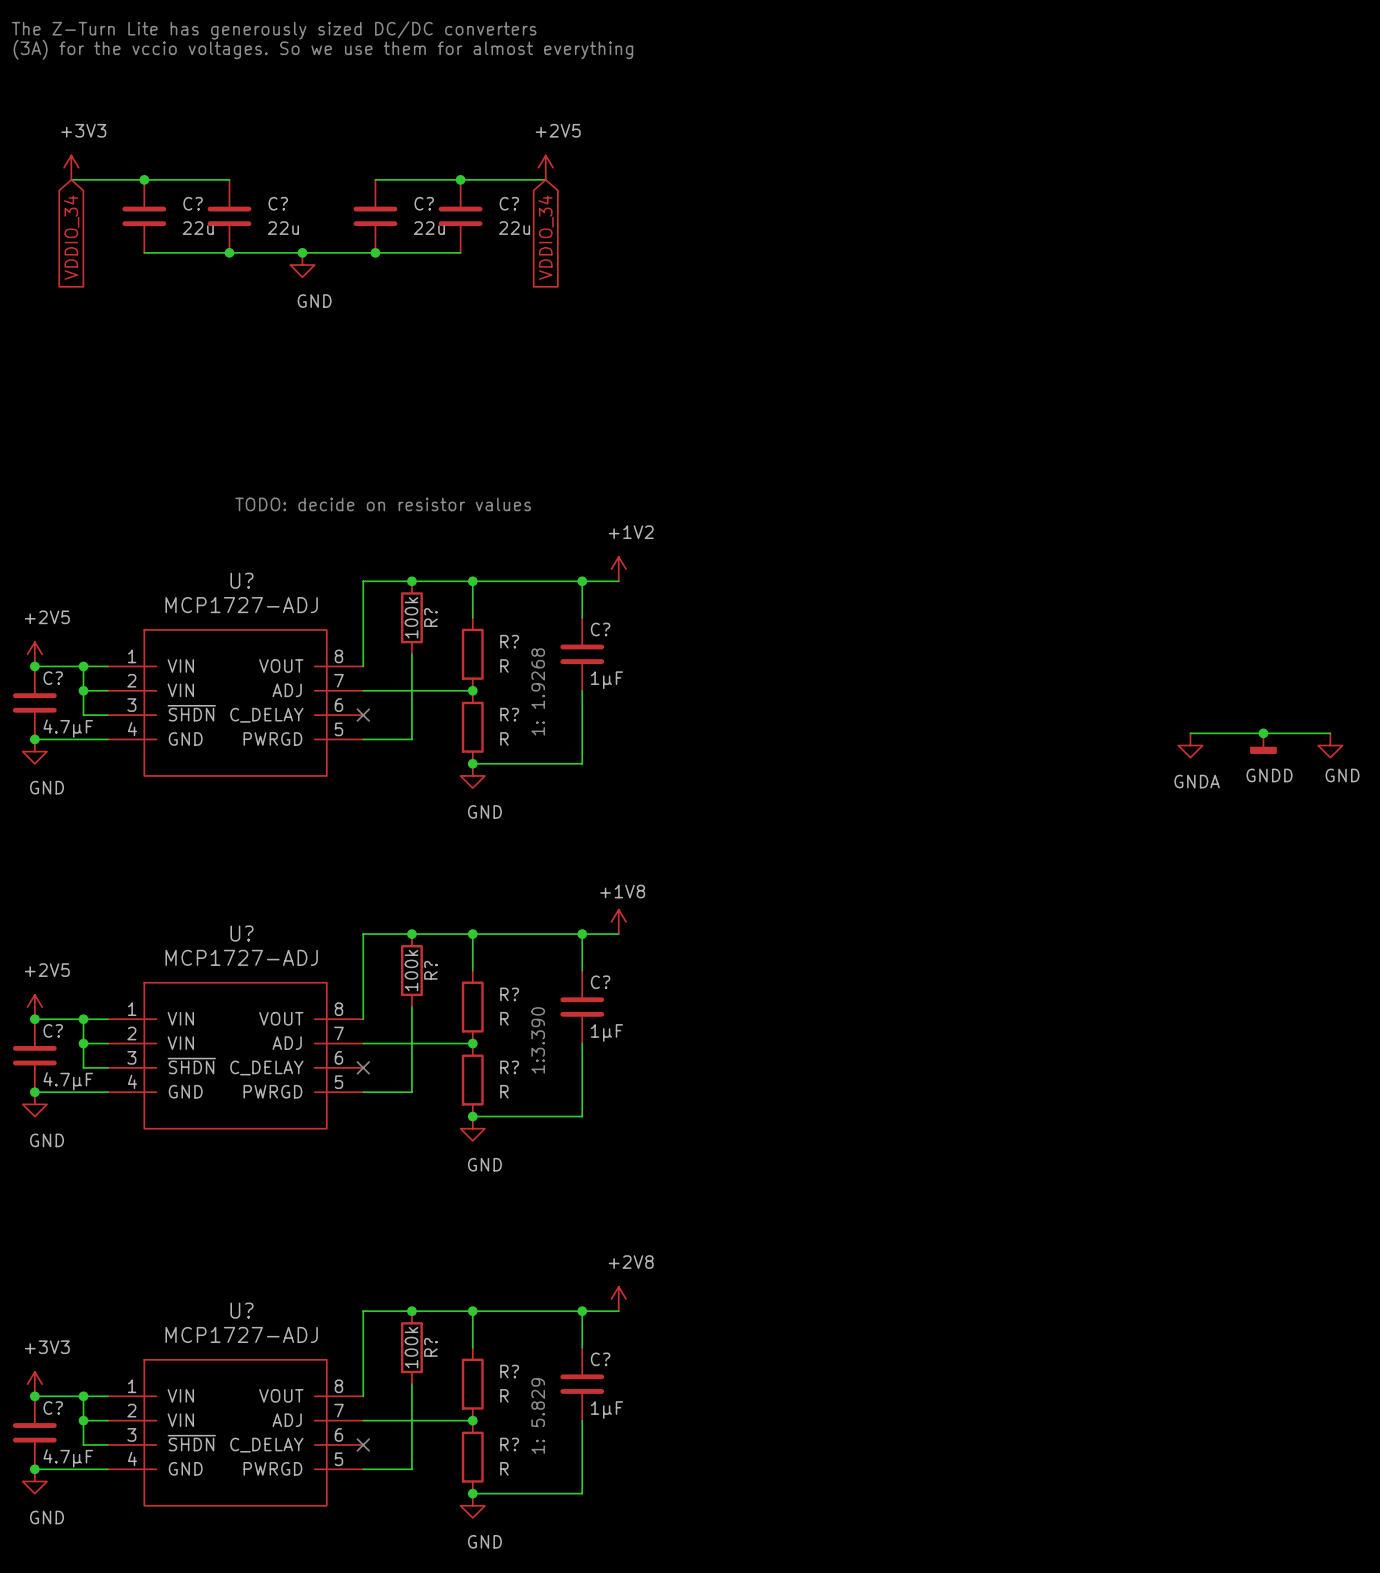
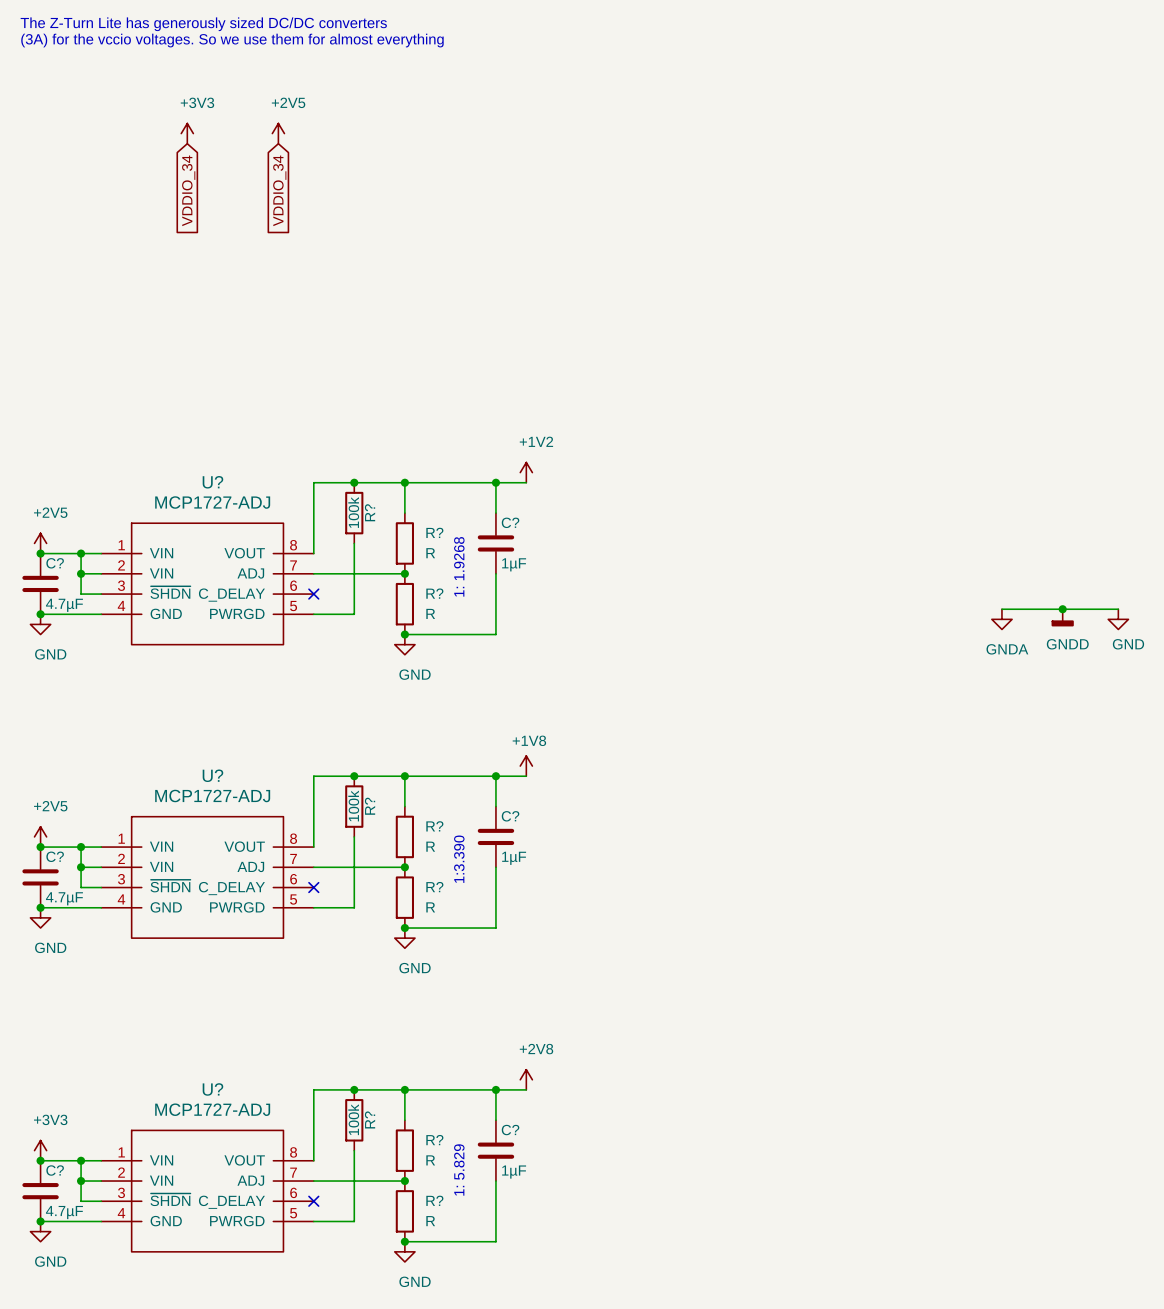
power symbol position: +3V3 (71, 167) -> +3V3 (187, 133)
power symbol position: +2V5 (545, 167) -> +2V5 (278, 133)
wire: (71, 179) (229, 179) -> none
junction: (144, 179) -> none
wire: (375, 179) (545, 179) -> none
junction: (460, 179) -> none
C?: 22u (144, 216) -> none
C?: 22u (229, 216) -> none
C?: 22u (375, 216) -> none
C?: 22u (460, 216) -> none
global label: none -> VDDIO_34 (188, 190)
global label: none -> VDDIO_34 (279, 190)
global label: VDDIO_34 (71, 237) -> none
global label: VDDIO_34 (546, 237) -> none
wire: (144, 252) (460, 252) -> none
junction: (229, 252) -> none
junction: (302, 252) -> none
junction: (375, 252) -> none
power symbol: GND (302, 265) -> none
text: TODO: decide on resistor values (383, 504) -> none

